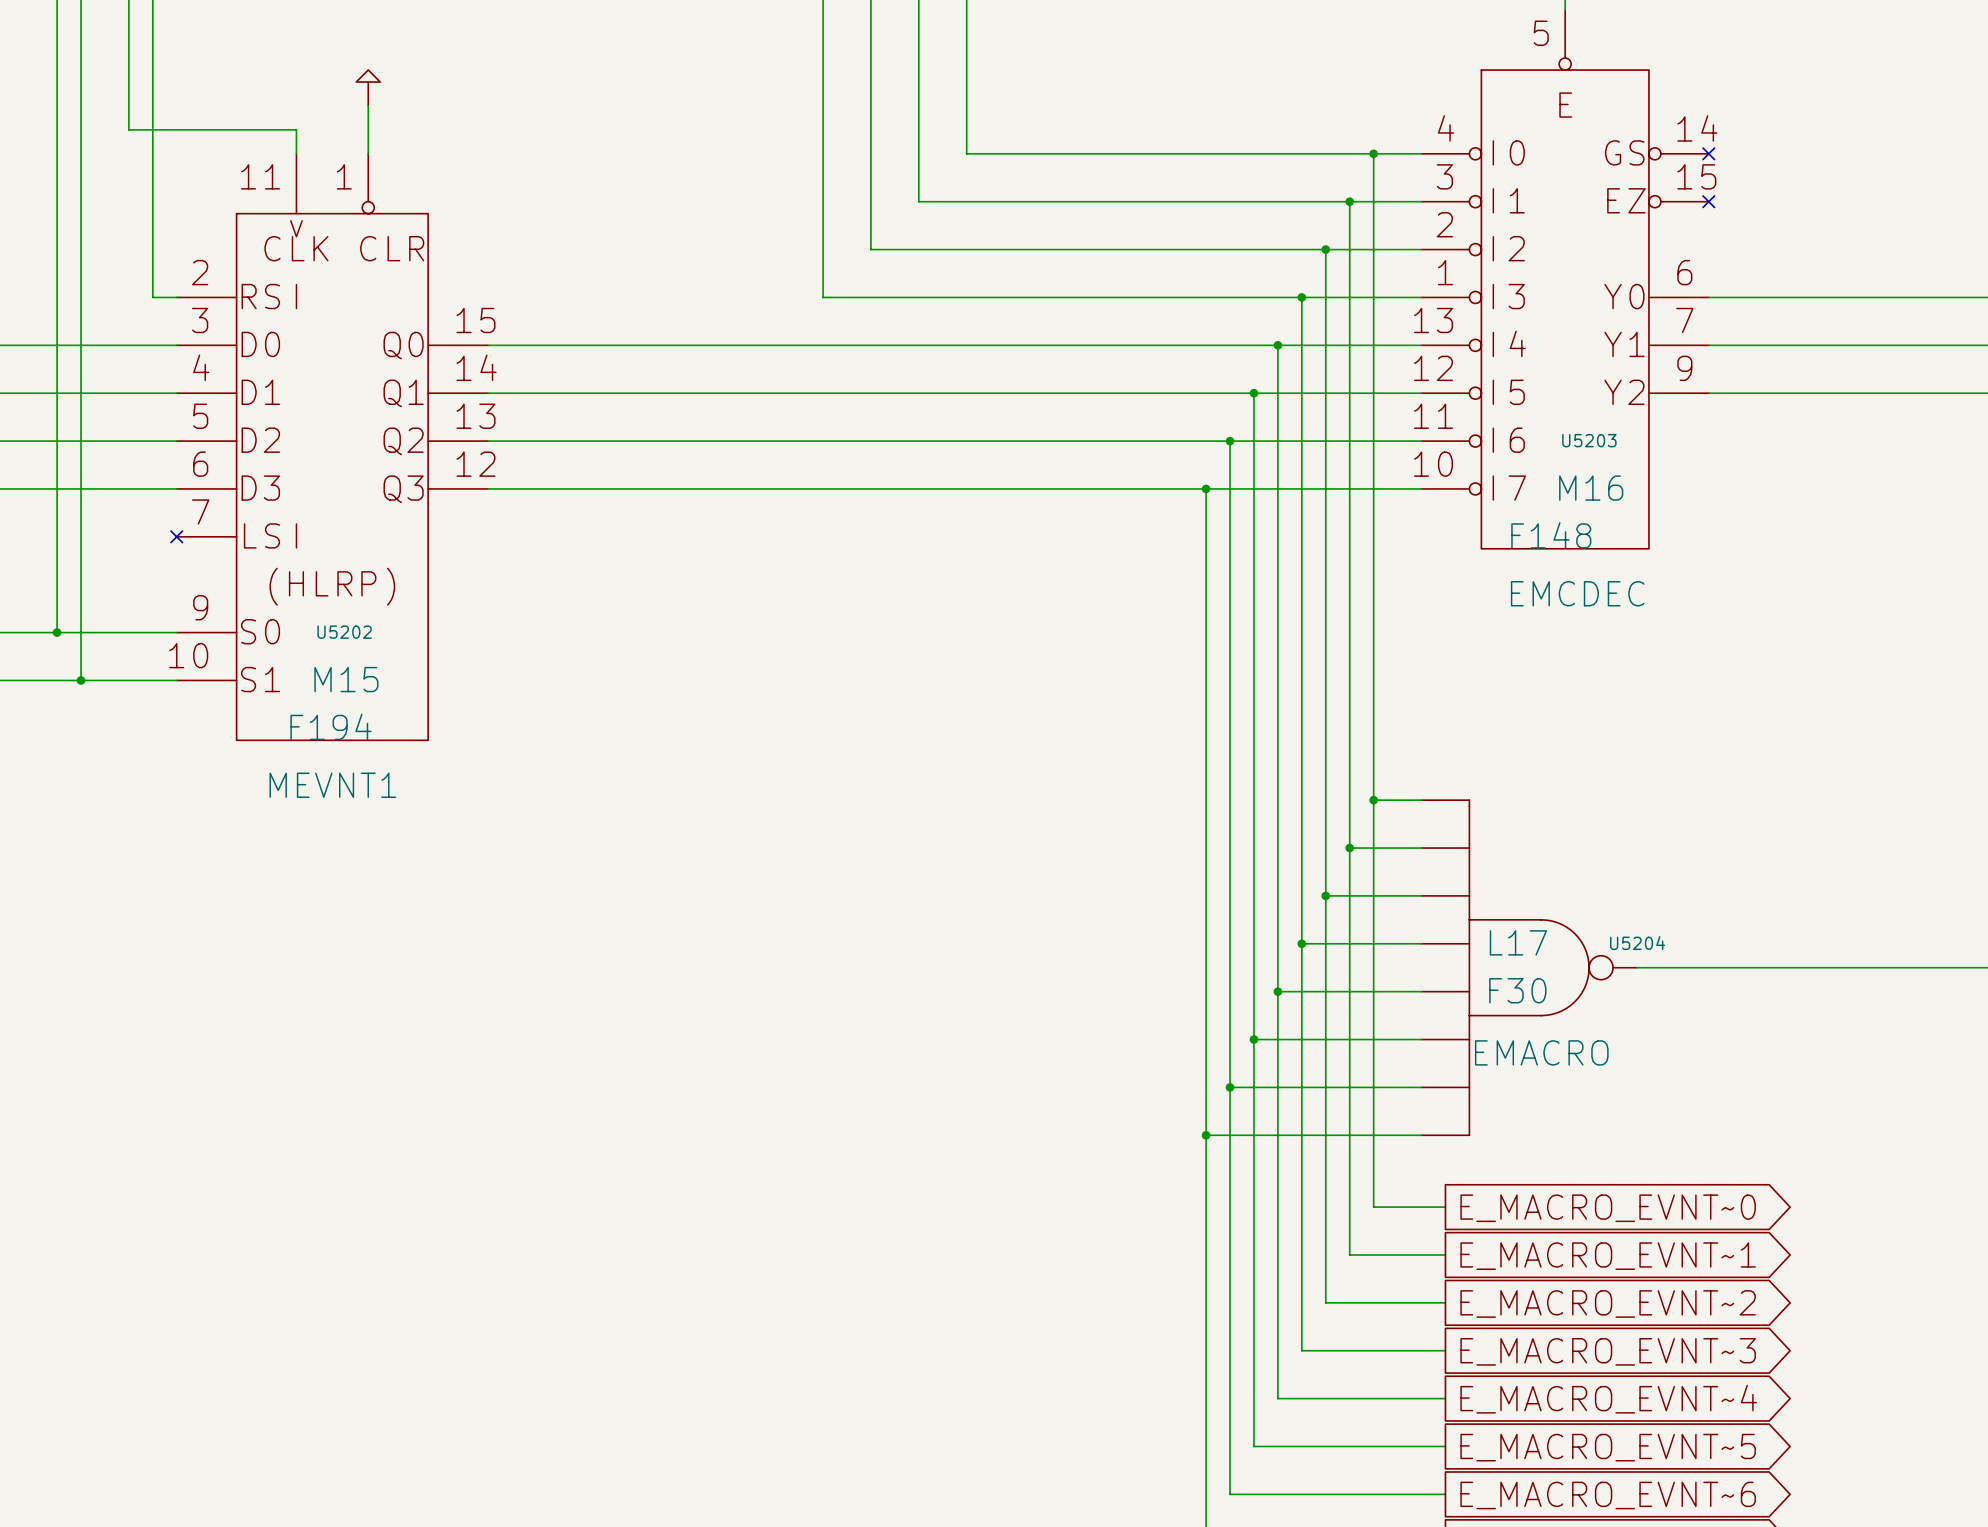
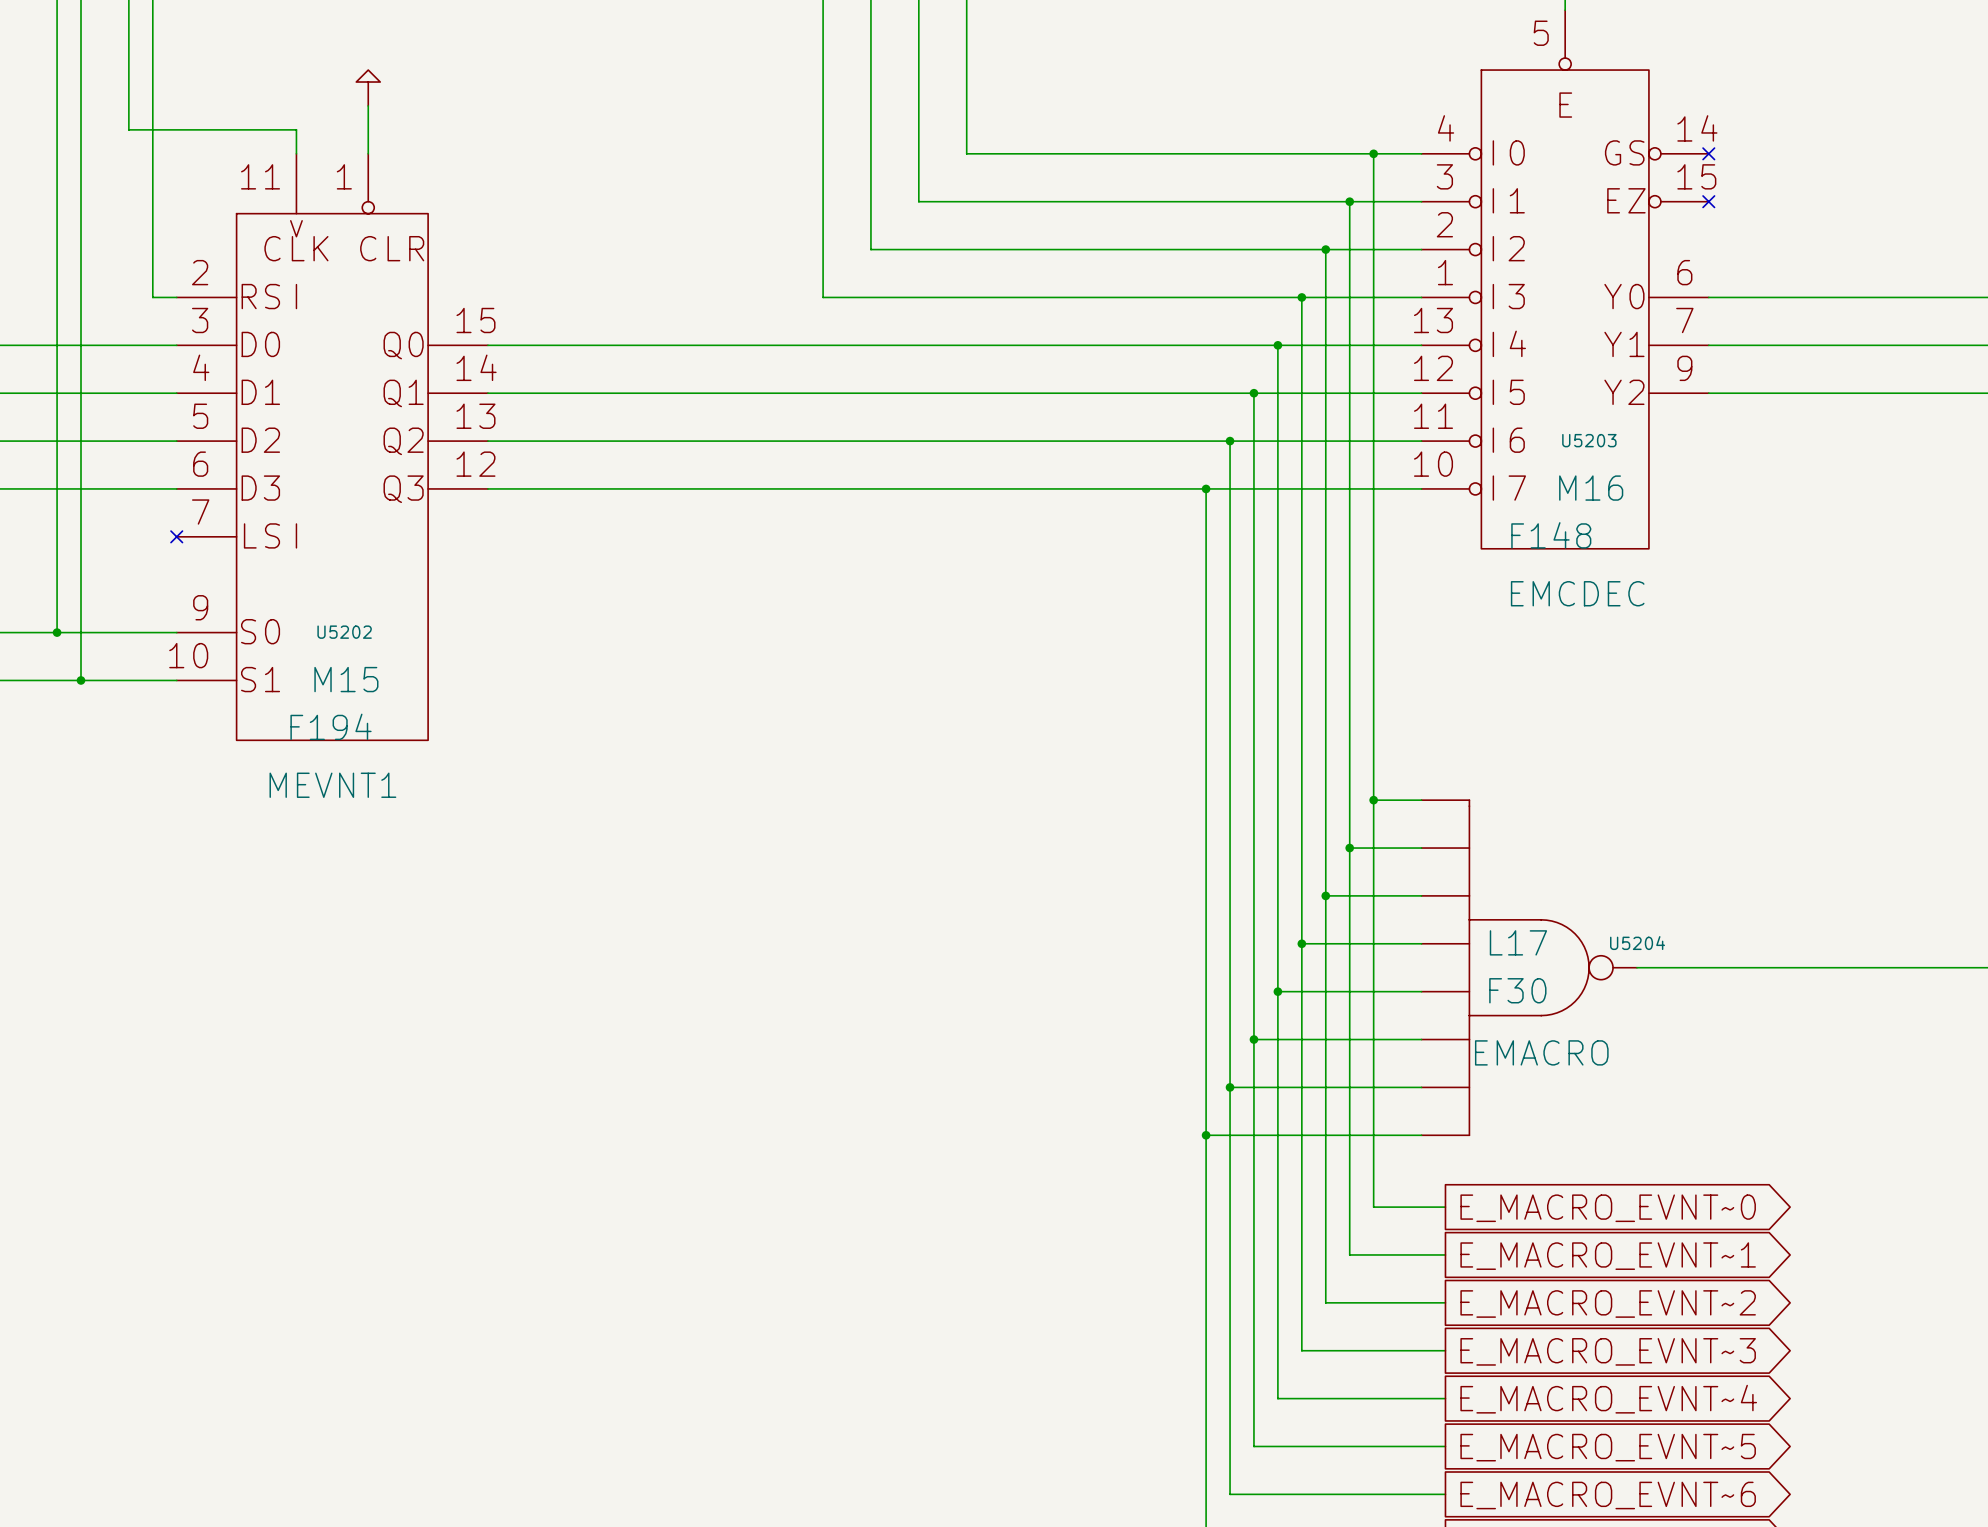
U5202 text: H (296, 583) -> none
U5202 text: L (322, 583) -> none
U5202 text: R (344, 583) -> none
U5202 text: P (368, 583) -> none
U5202 text: ( (273, 586) -> none
U5202 text: ) (391, 586) -> none

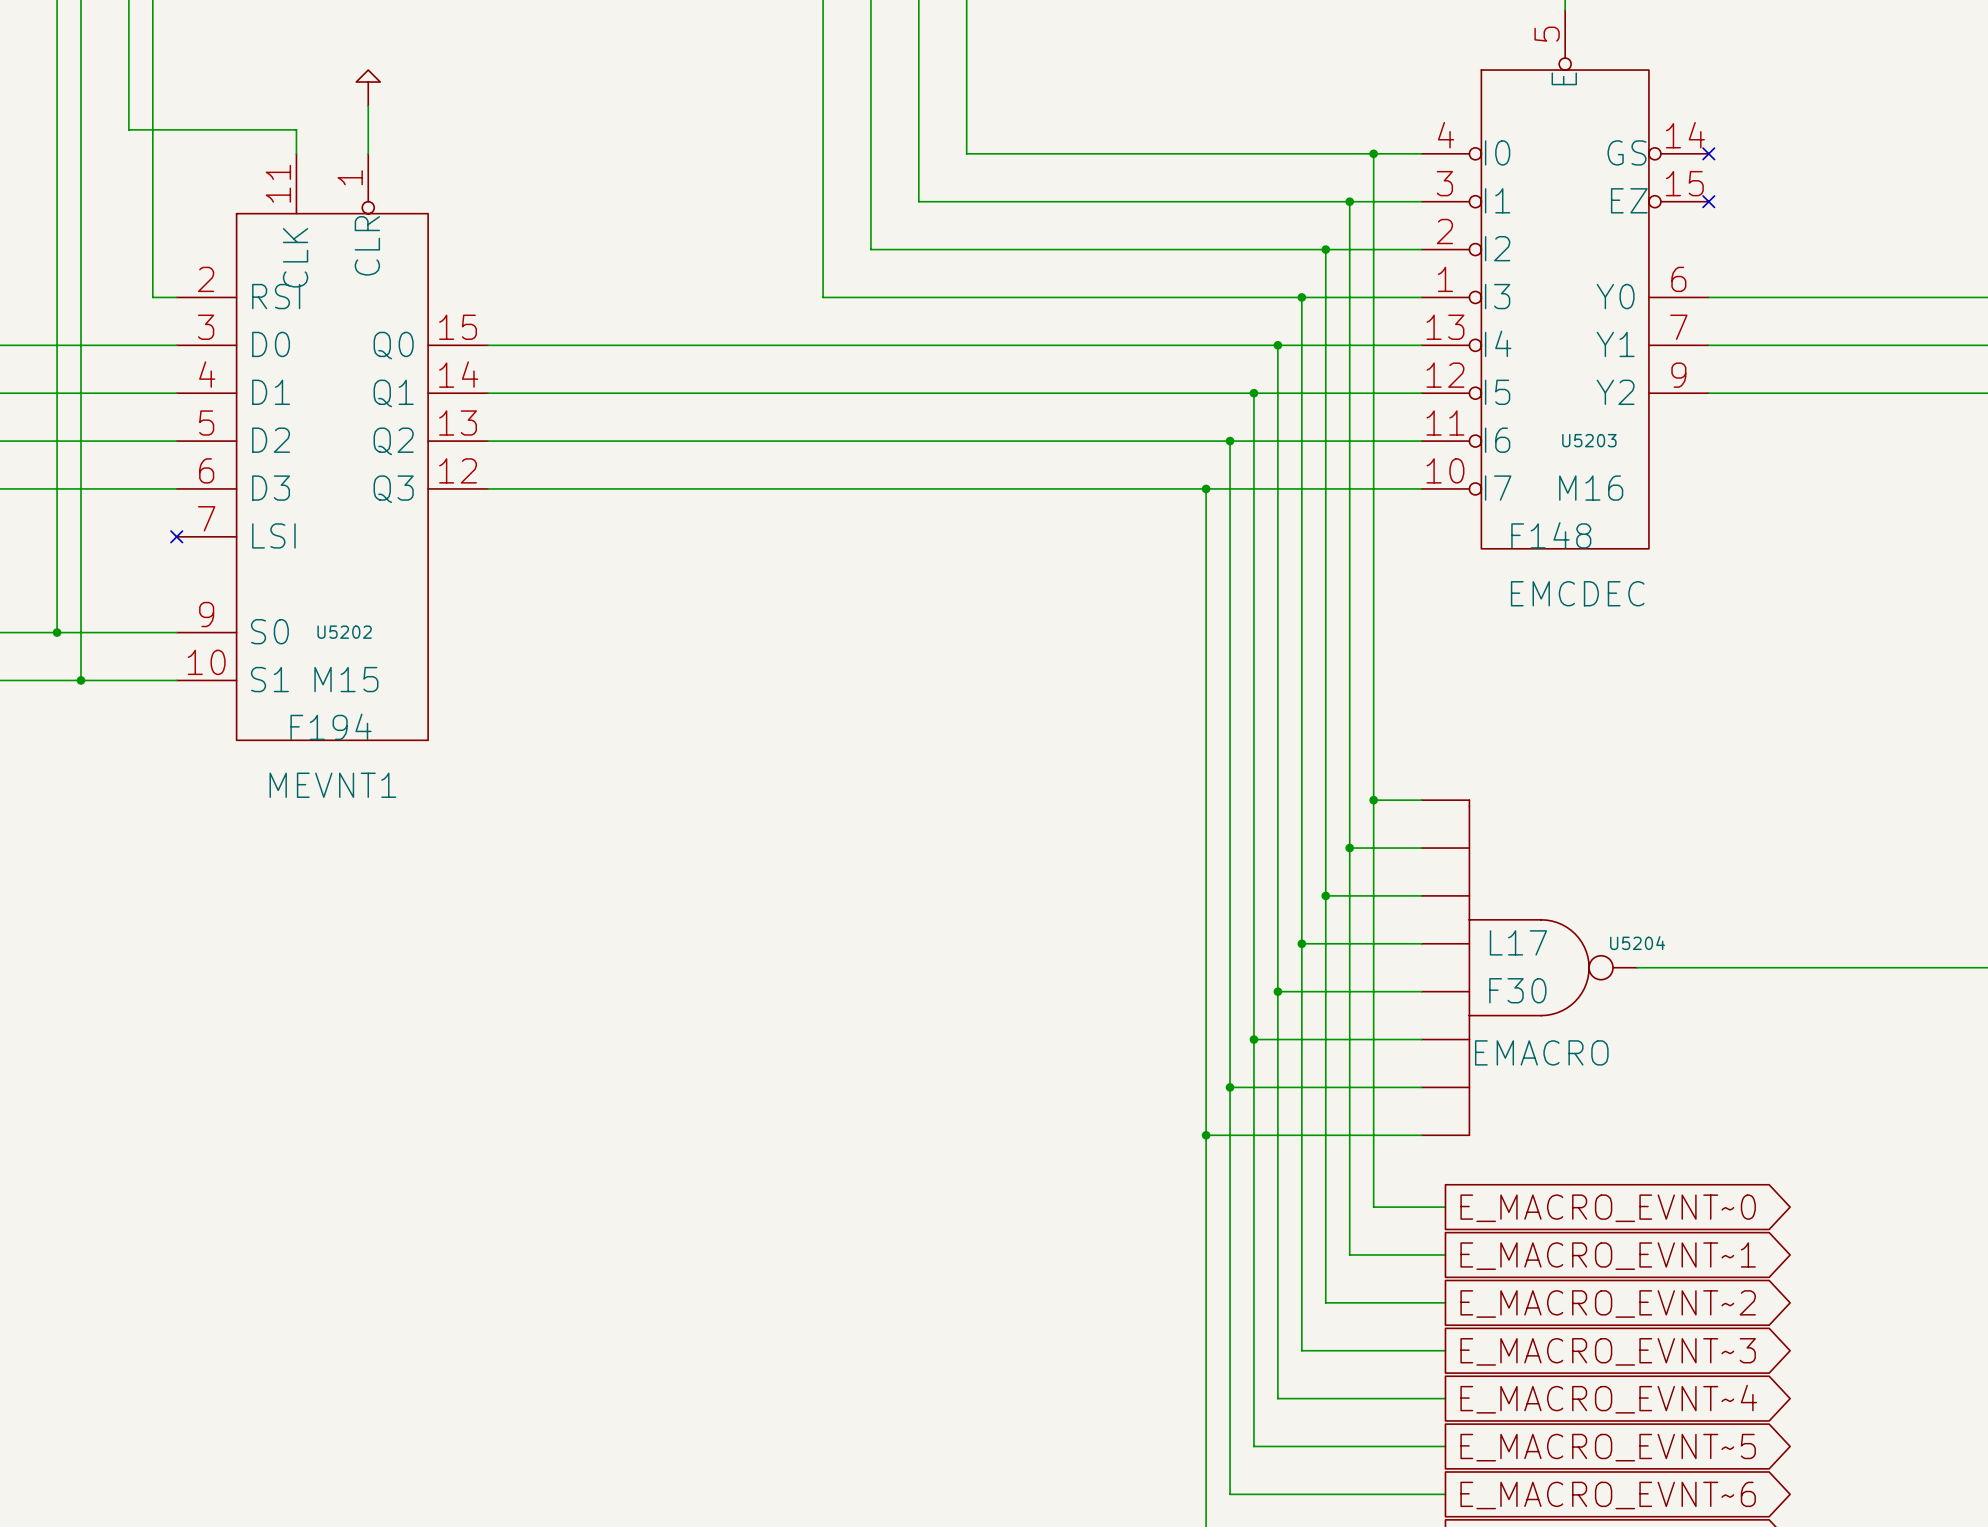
U5203 symbol: [1421, 10, 1709, 549] -> [1421, 10, 1709, 549]
U5202 symbol: [176, 153, 488, 741] -> [176, 153, 488, 741]

